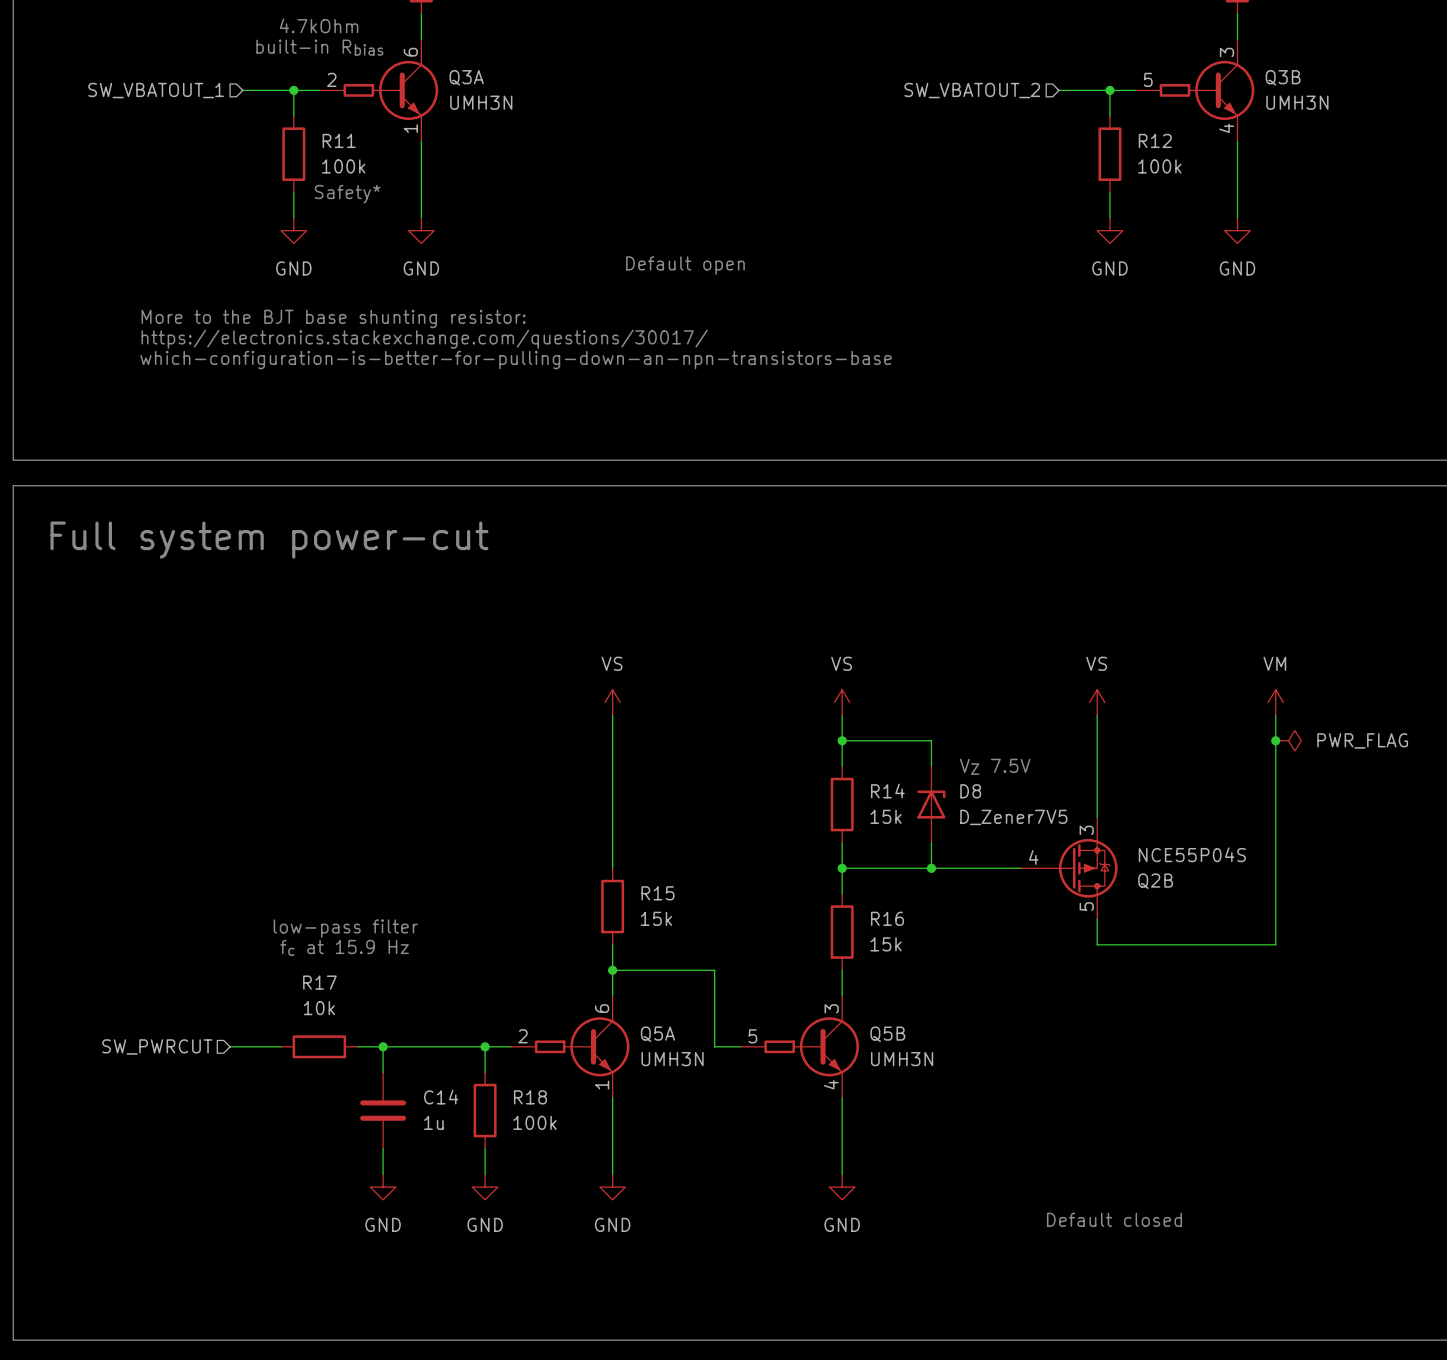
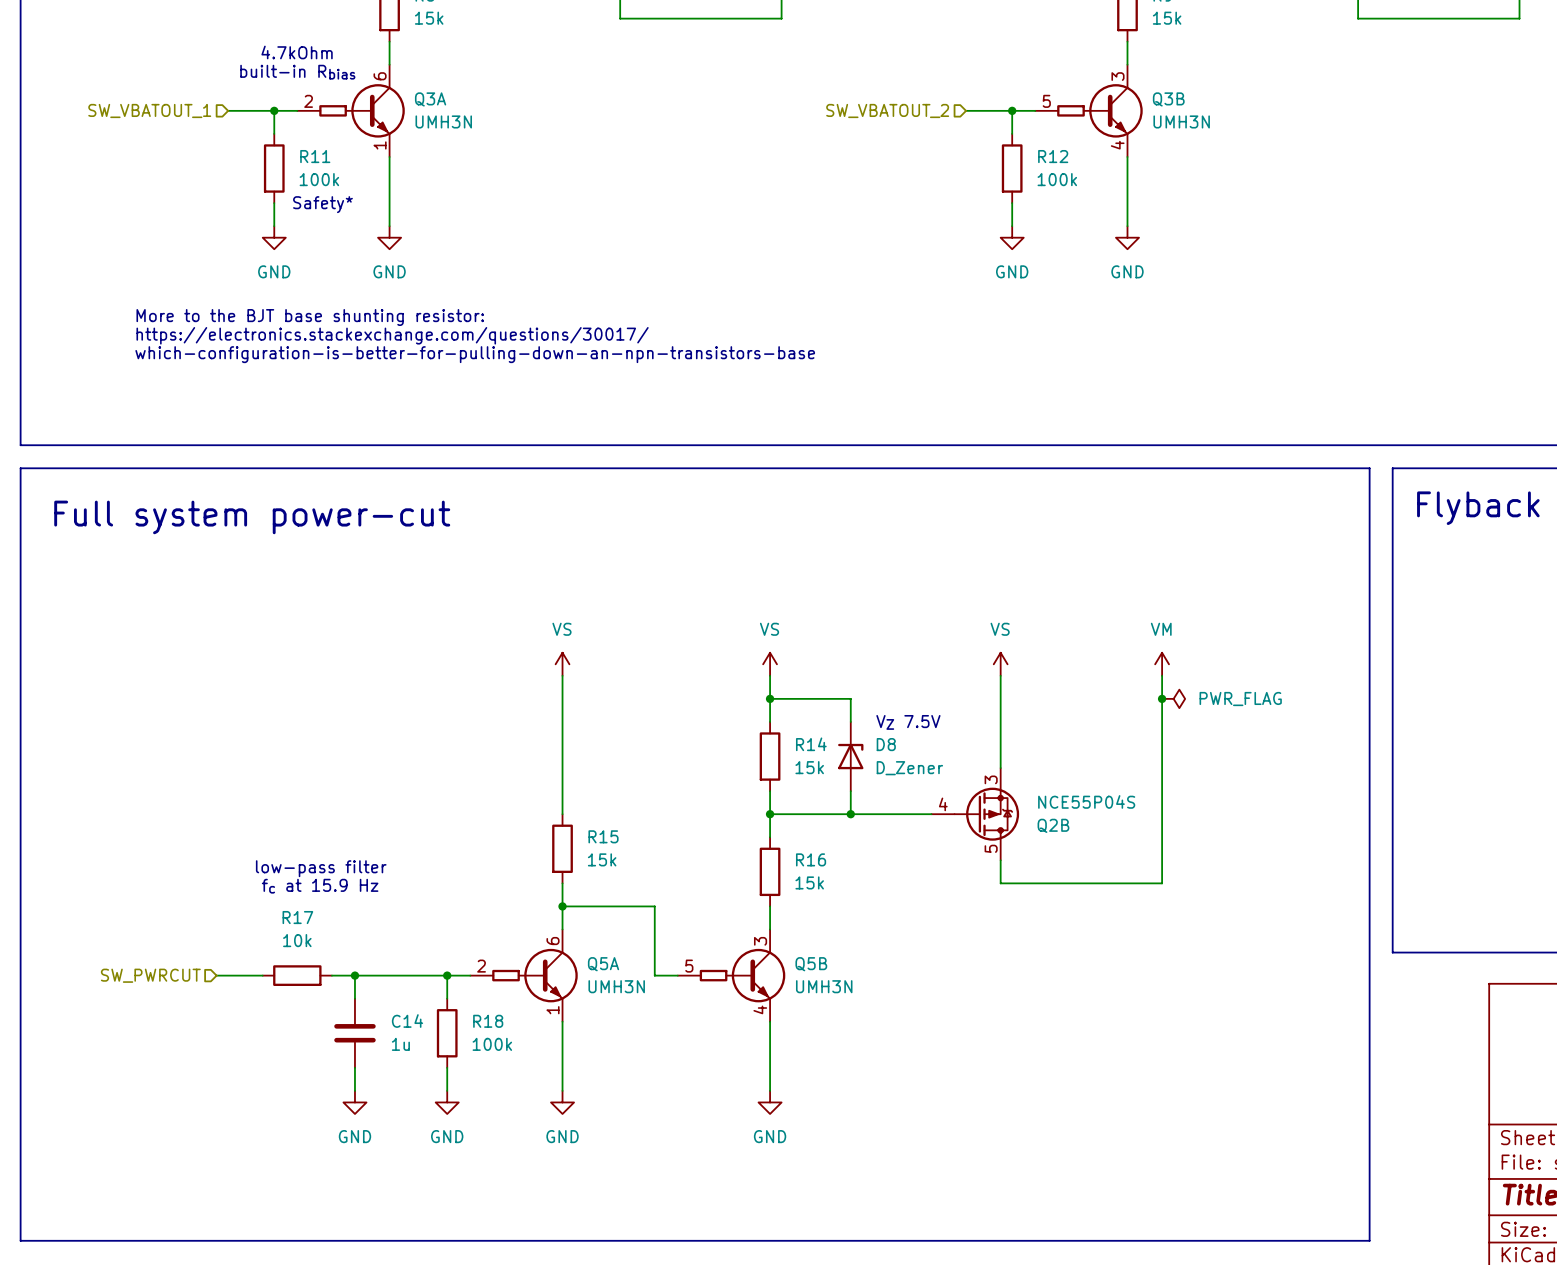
text: Default open (685, 265) -> none
D8 value: D_Zener7V5 (1013, 817) -> D_Zener (909, 768)
text: Default closed (1114, 1219) -> none

